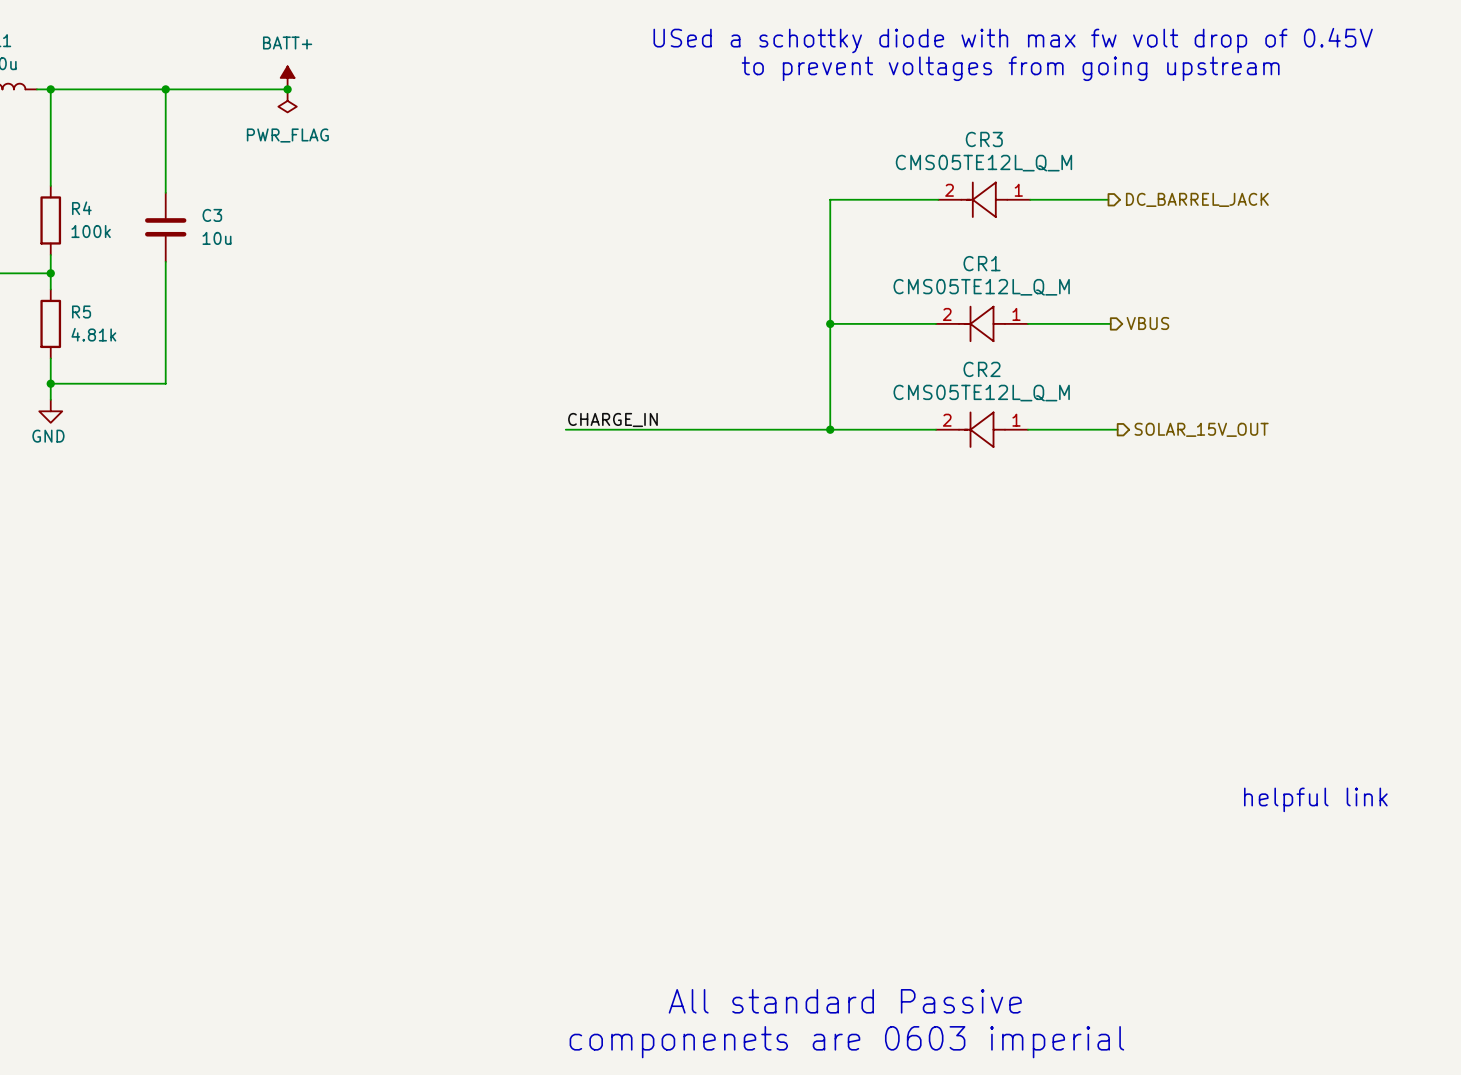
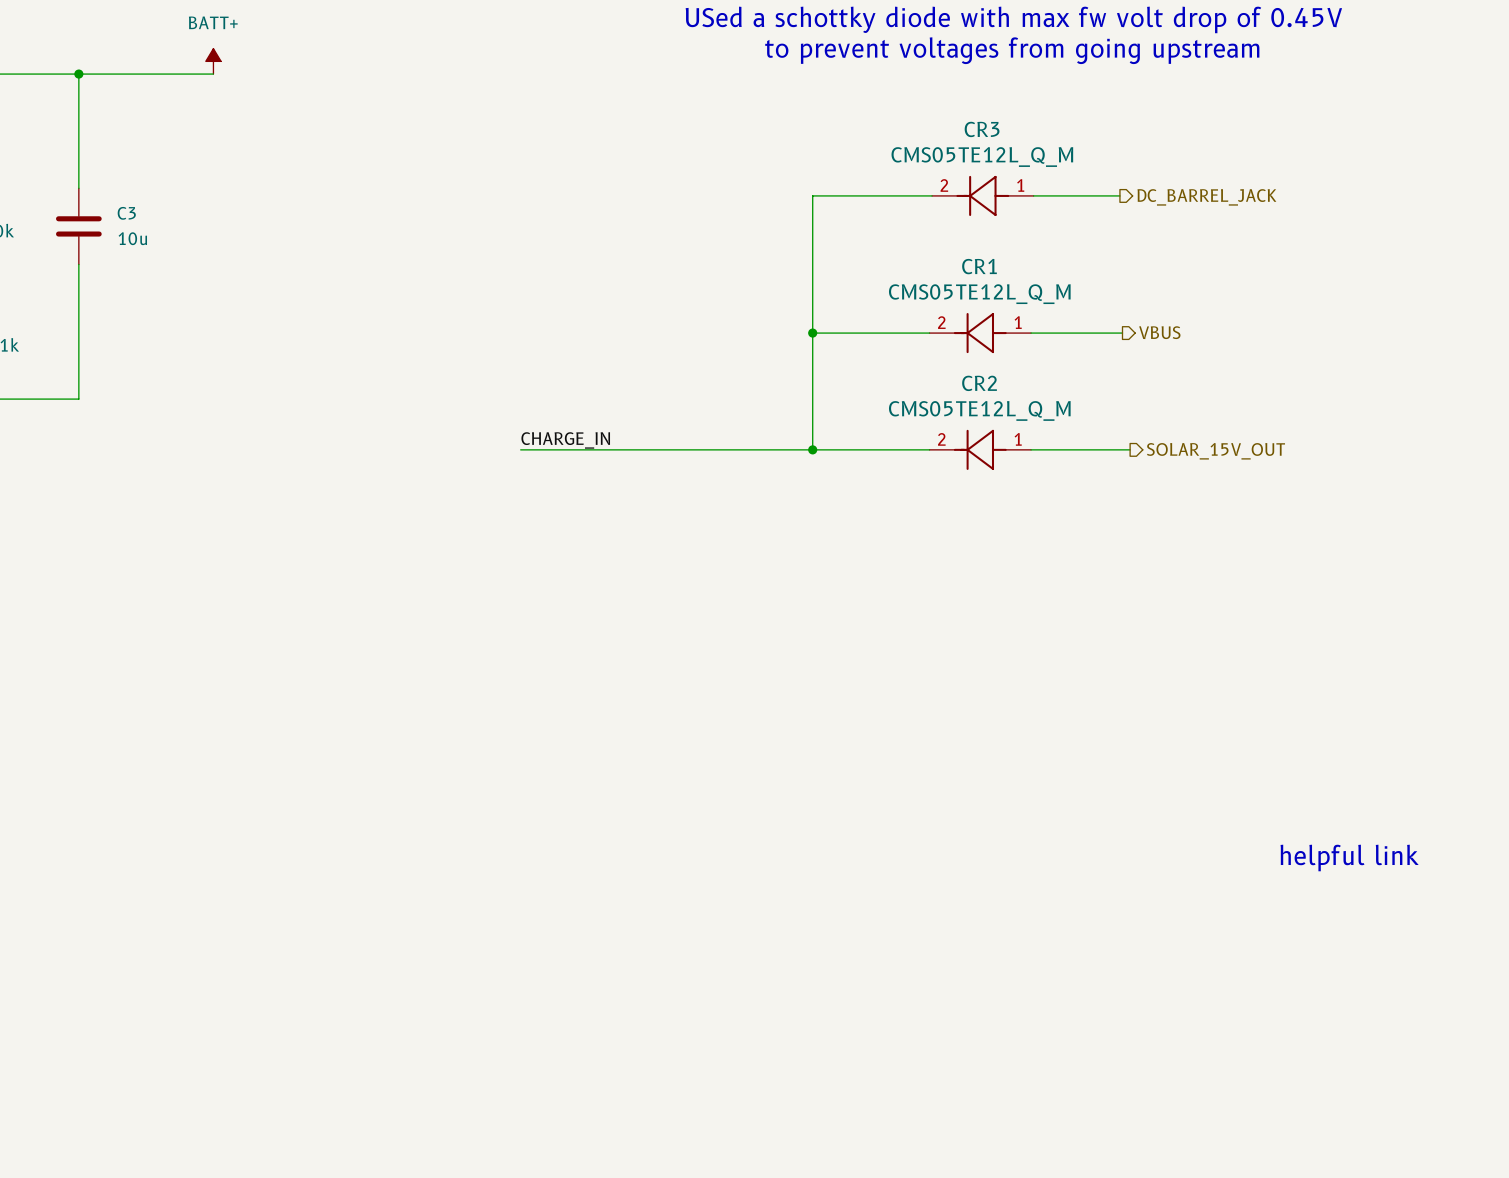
junction: (287, 89) -> none
power symbol: PWR_FLAG (287, 100) -> none
text: All standard Passive (845, 1001) -> none
text: componenets are 0603 imperial (846, 1042) -> none

